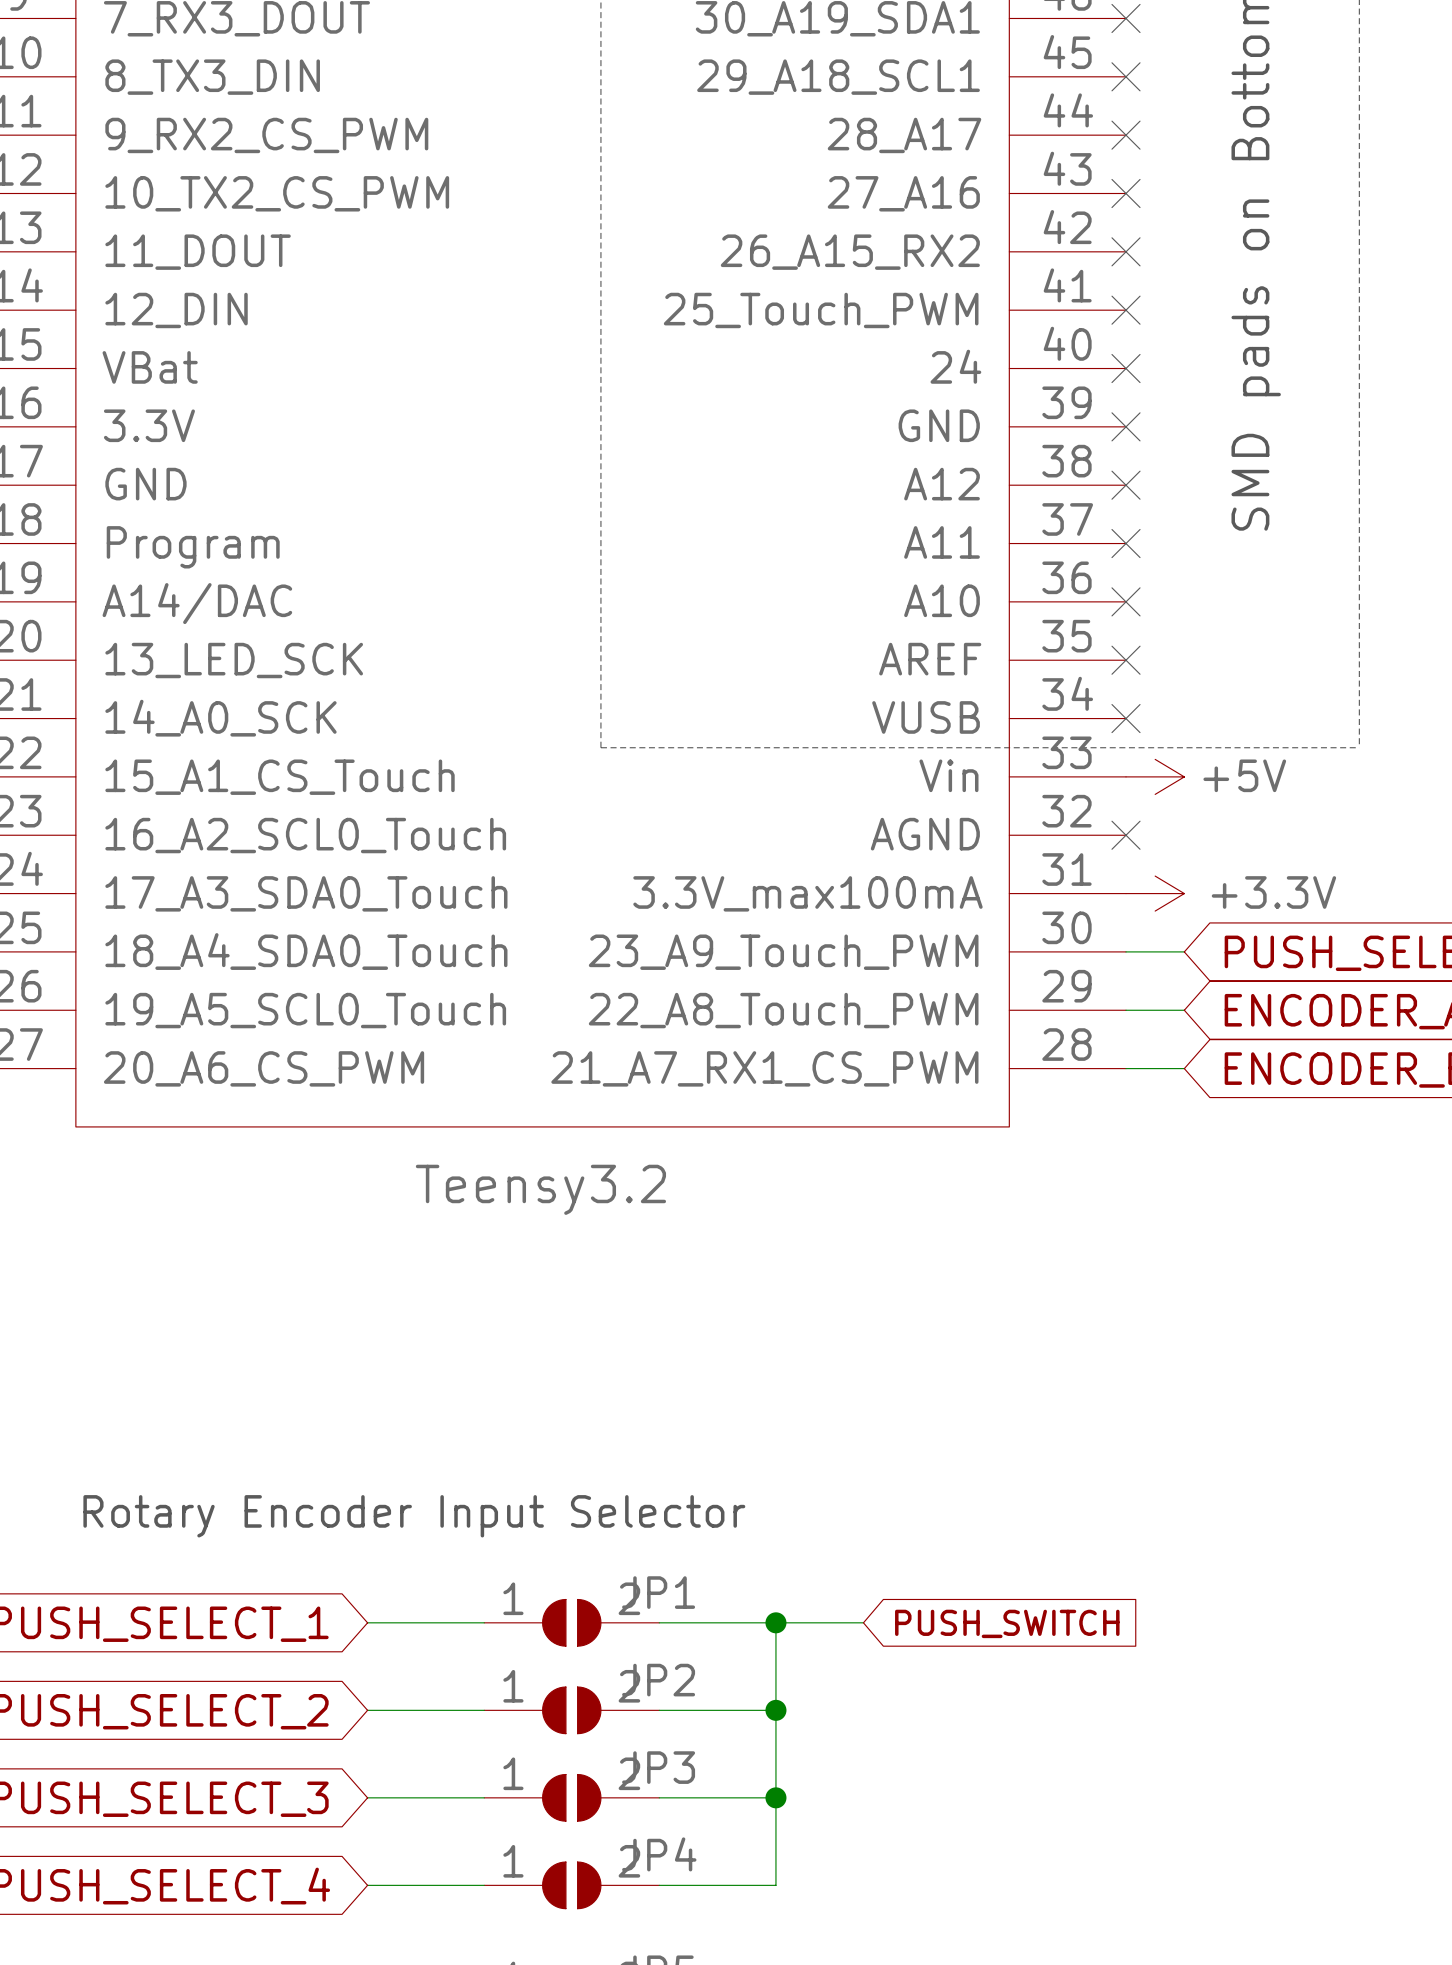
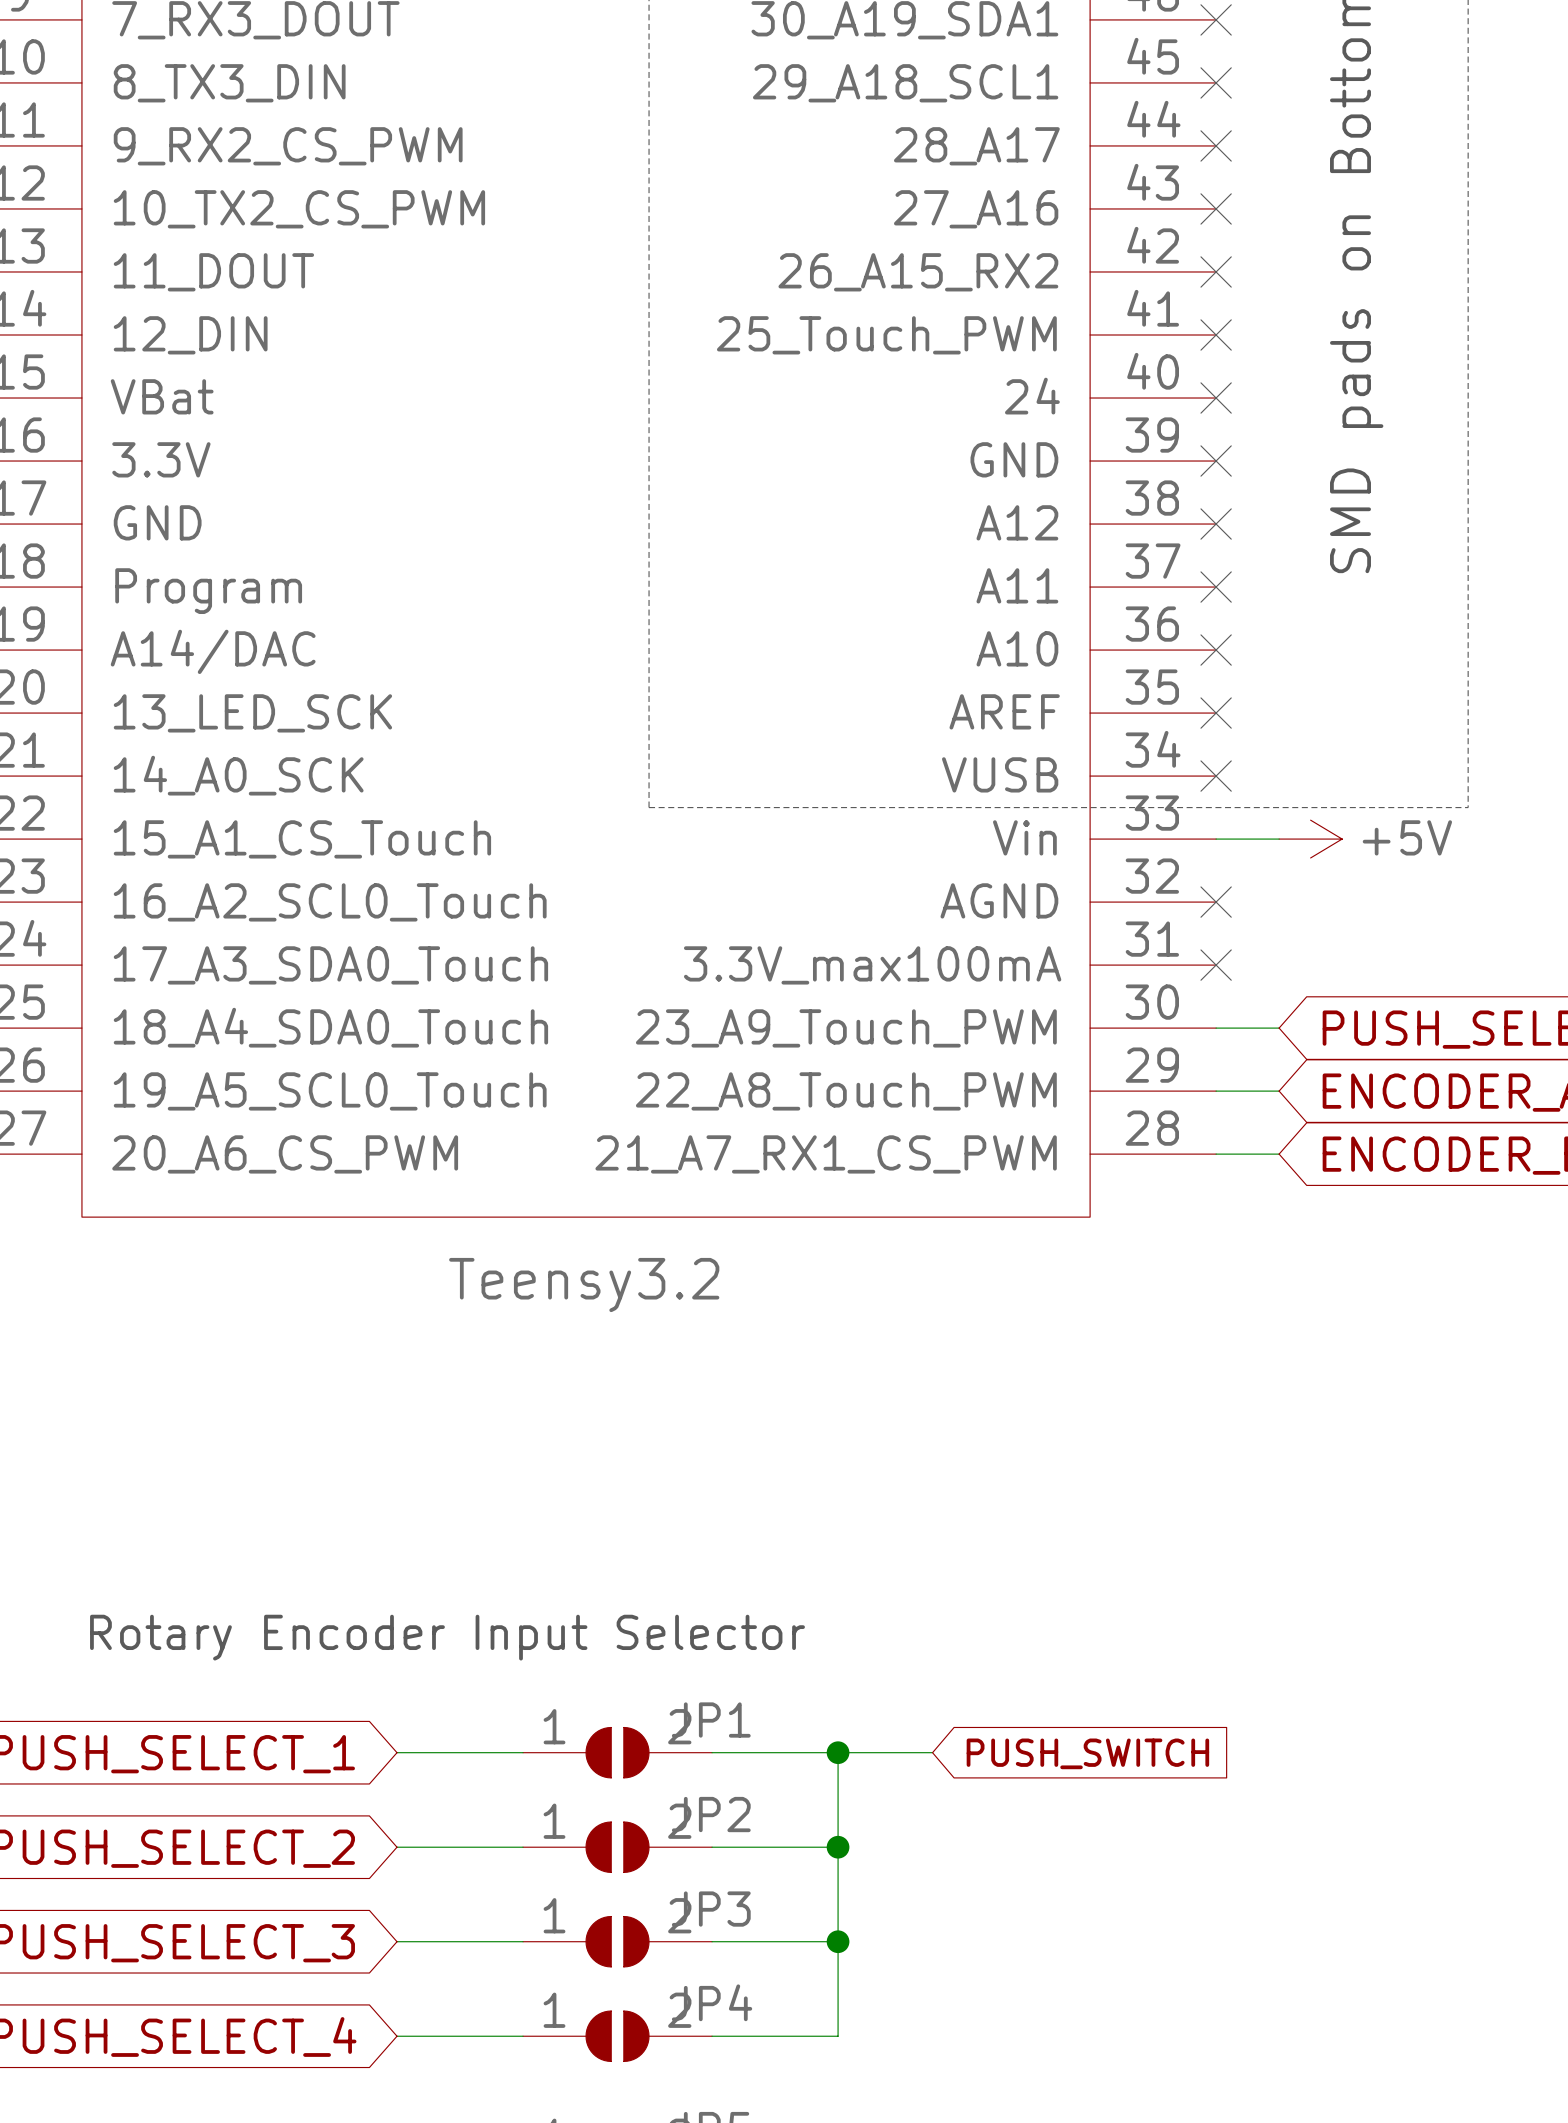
power symbol position: +5V (1155, 776) -> +5V (1310, 839)
no-connect mark: none -> (1216, 965)
power symbol: +3.3V (1155, 893) -> none

